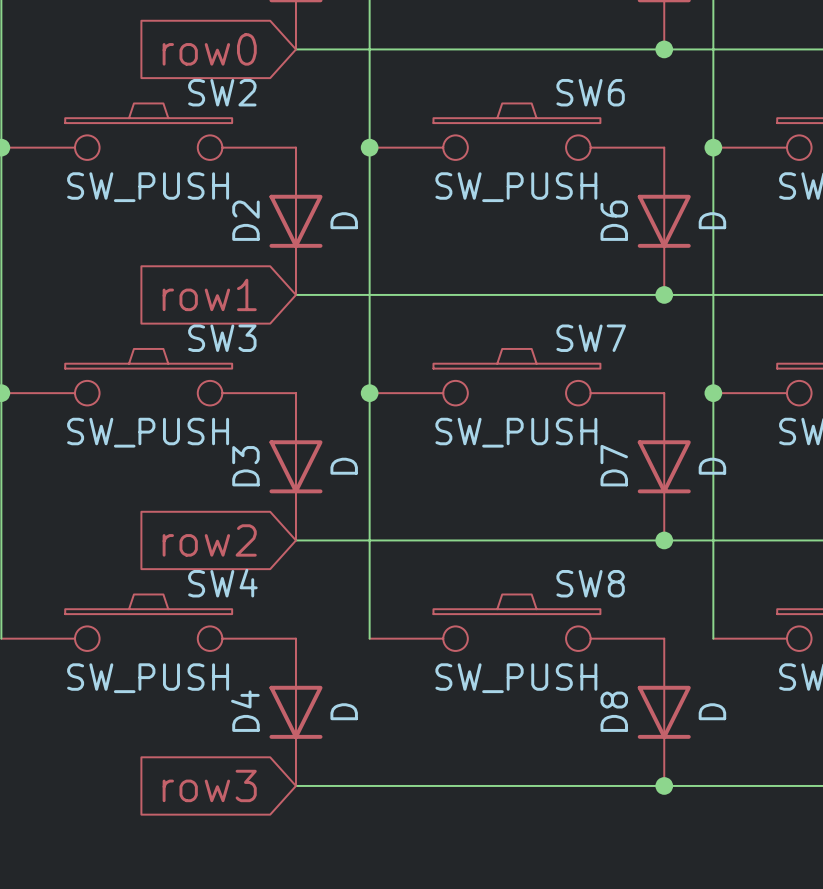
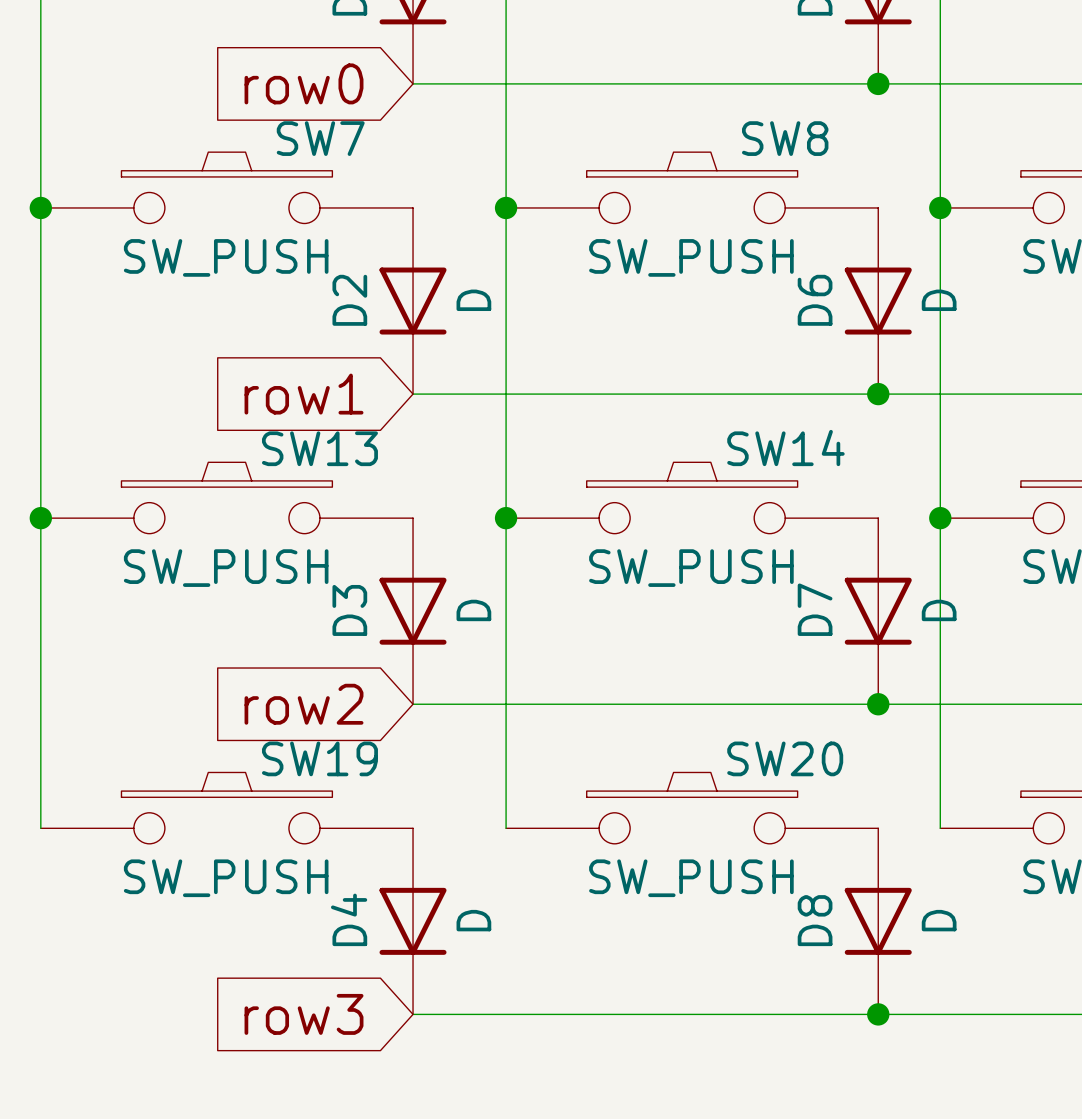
SW2 name: SW2 (222, 92) -> SW7 (320, 138)
SW6 name: SW6 (590, 92) -> SW8 (785, 138)
SW3 name: SW3 (222, 338) -> SW13 (319, 448)
SW7 name: SW7 (591, 338) -> SW14 (785, 448)
SW4 name: SW4 (222, 583) -> SW19 (319, 758)
SW8 name: SW8 (590, 583) -> SW20 (785, 758)

